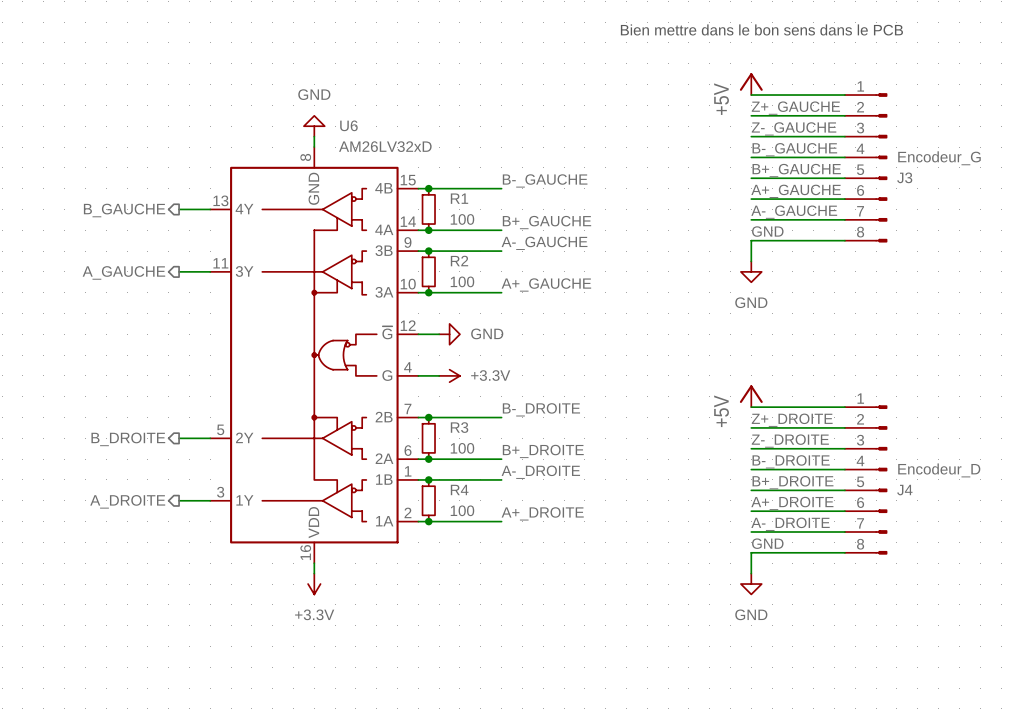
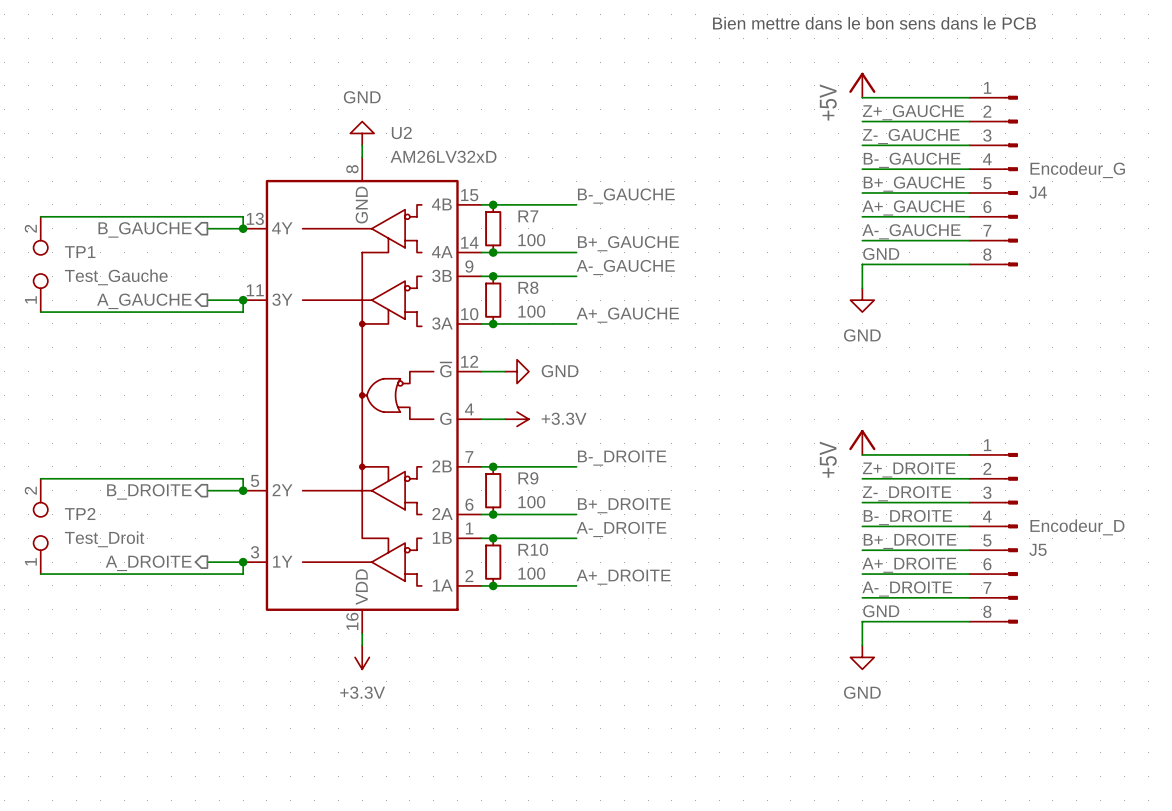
U6 name: U6 (348, 125) -> U2 (401, 133)
J3 name: J3 (904, 177) -> J4 (1038, 192)
R1 name: R1 (459, 198) -> R7 (528, 216)
wire: none -> (40, 216) (243, 216) (243, 228)
junction: none -> (243, 228)
TP1: none -> Test_Gauche (40, 264)
R2 name: R2 (459, 261) -> R8 (528, 287)
wire: none -> (243, 300) (243, 312) (40, 312)
junction: none -> (243, 300)
wire: none -> (40, 478) (243, 478) (243, 490)
R3 name: R3 (459, 427) -> R9 (528, 478)
junction: none -> (243, 490)
TP2: none -> Test_Droit (40, 526)
R4 name: R4 (459, 489) -> R10 (533, 549)
J4 name: J4 (904, 490) -> J5 (1037, 549)
wire: none -> (243, 562) (243, 574) (40, 574)
junction: none -> (243, 562)

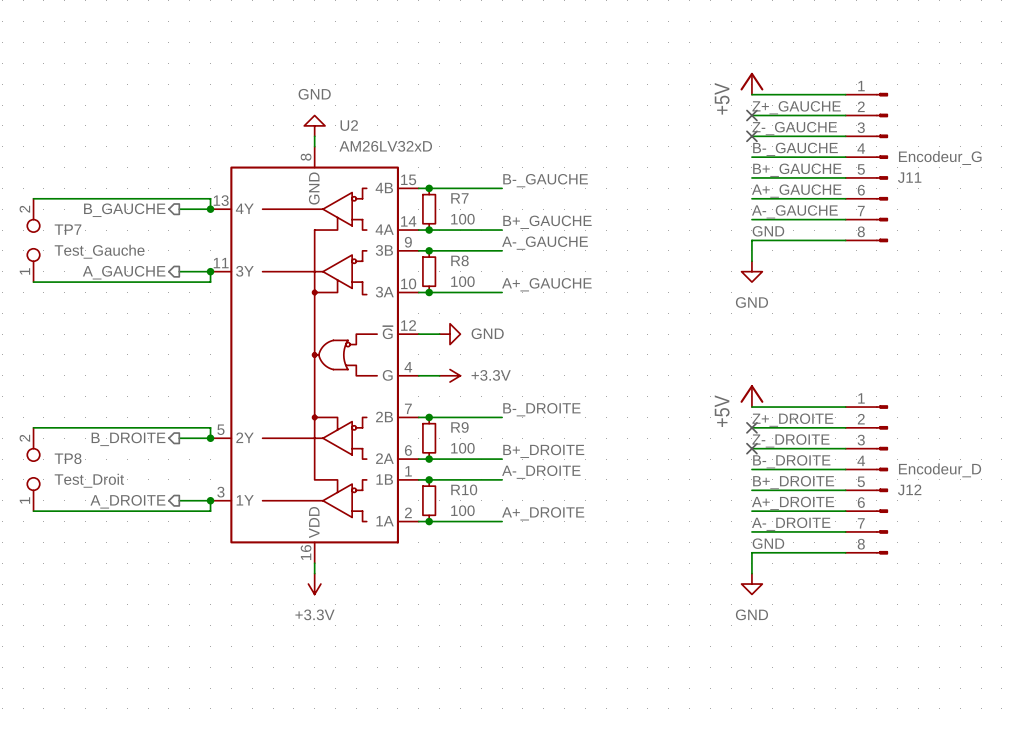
text: Bien mettre dans le bon sens dans le PCB (874, 23) -> none
no-connect mark: none -> (751, 115)
no-connect mark: none -> (751, 136)
J4 name: J4 (1038, 192) -> J11 (909, 177)
TP1 name: TP1 (80, 252) -> TP7 (68, 229)
no-connect mark: none -> (751, 427)
no-connect mark: none -> (751, 448)
TP2 name: TP2 (80, 513) -> TP8 (68, 458)
J5 name: J5 (1037, 549) -> J12 (909, 489)

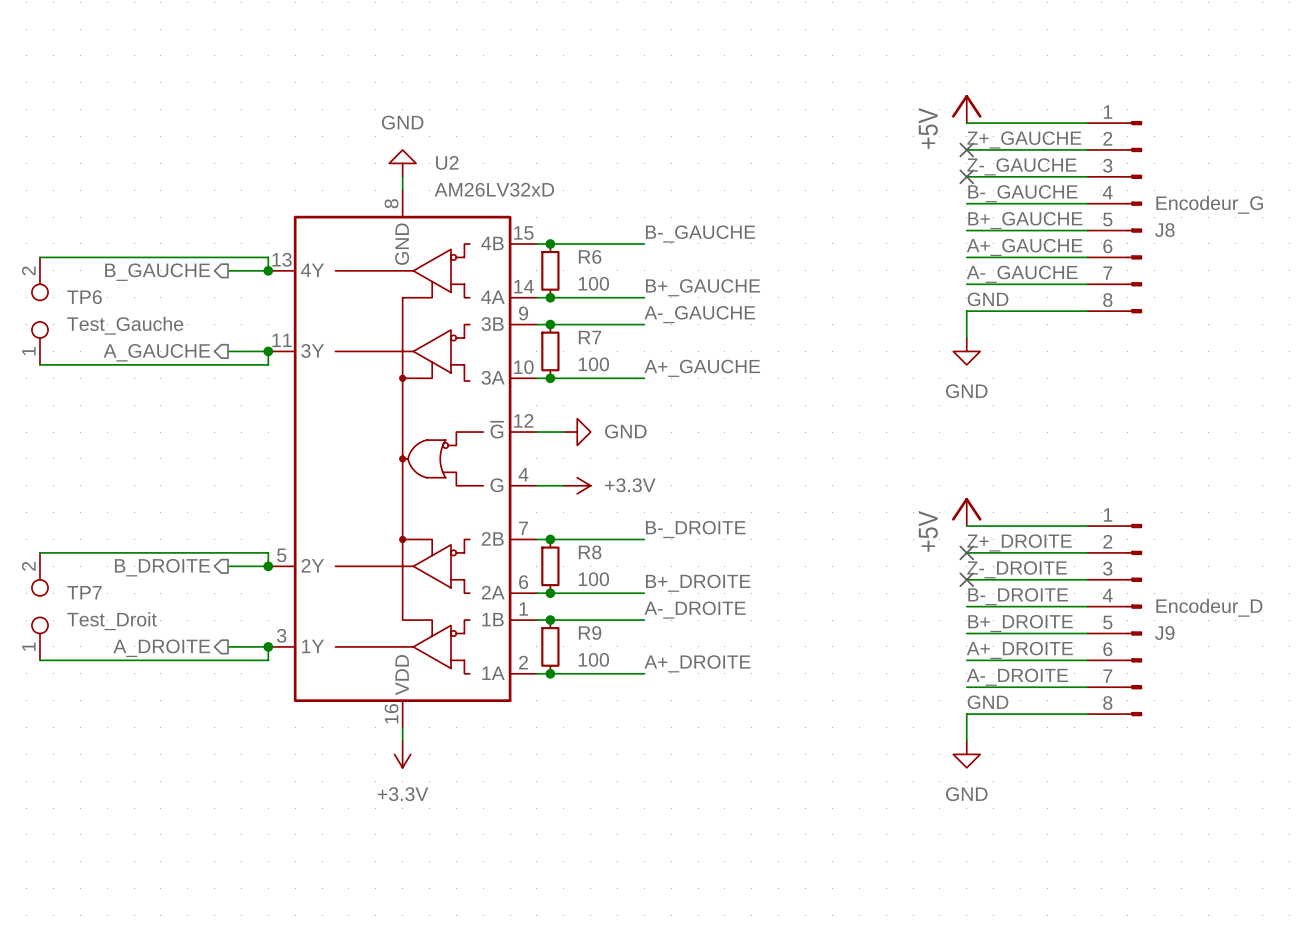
J11 name: J11 (909, 177) -> J8 (1164, 230)
R7 name: R7 (459, 198) -> R6 (590, 256)
TP7 name: TP7 (68, 229) -> TP6 (84, 297)
R8 name: R8 (459, 260) -> R7 (590, 337)
R9 name: R9 (459, 427) -> R8 (590, 552)
TP8 name: TP8 (68, 458) -> TP7 (84, 592)
R10 name: R10 (464, 489) -> R9 (590, 632)
J12 name: J12 (909, 489) -> J9 (1164, 632)

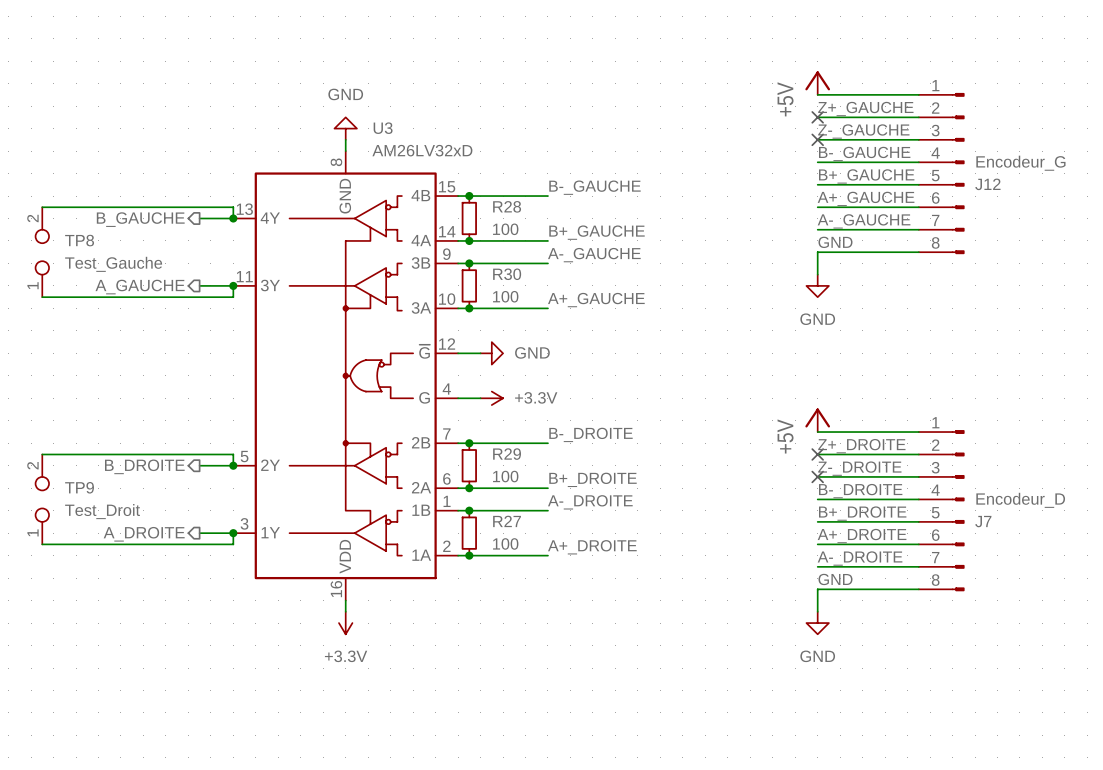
U2 name: U2 (447, 162) -> U3 (383, 128)
J8 name: J8 (1164, 230) -> J12 (987, 184)
R6 name: R6 (590, 256) -> R28 (507, 206)
TP6 name: TP6 (84, 297) -> TP8 (79, 240)
R7 name: R7 (590, 337) -> R30 (507, 274)
R8 name: R8 (590, 552) -> R29 (507, 454)
TP7 name: TP7 (84, 592) -> TP9 (79, 487)
R9 name: R9 (590, 632) -> R27 (507, 521)
J9 name: J9 (1164, 632) -> J7 (983, 521)

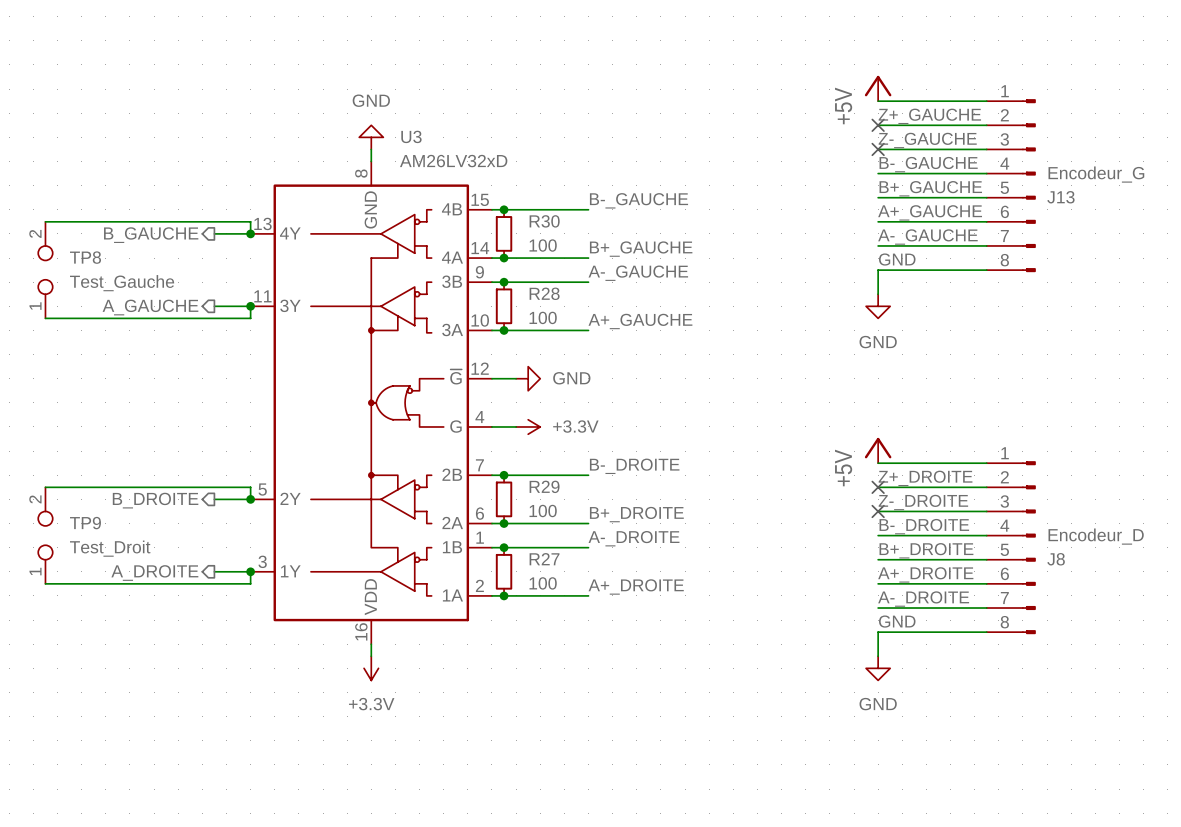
J12 name: J12 (987, 184) -> J13 (1060, 197)
R28 name: R28 (507, 206) -> R30 (544, 221)
R30 name: R30 (507, 274) -> R28 (544, 293)
J7 name: J7 (983, 521) -> J8 (1056, 559)

